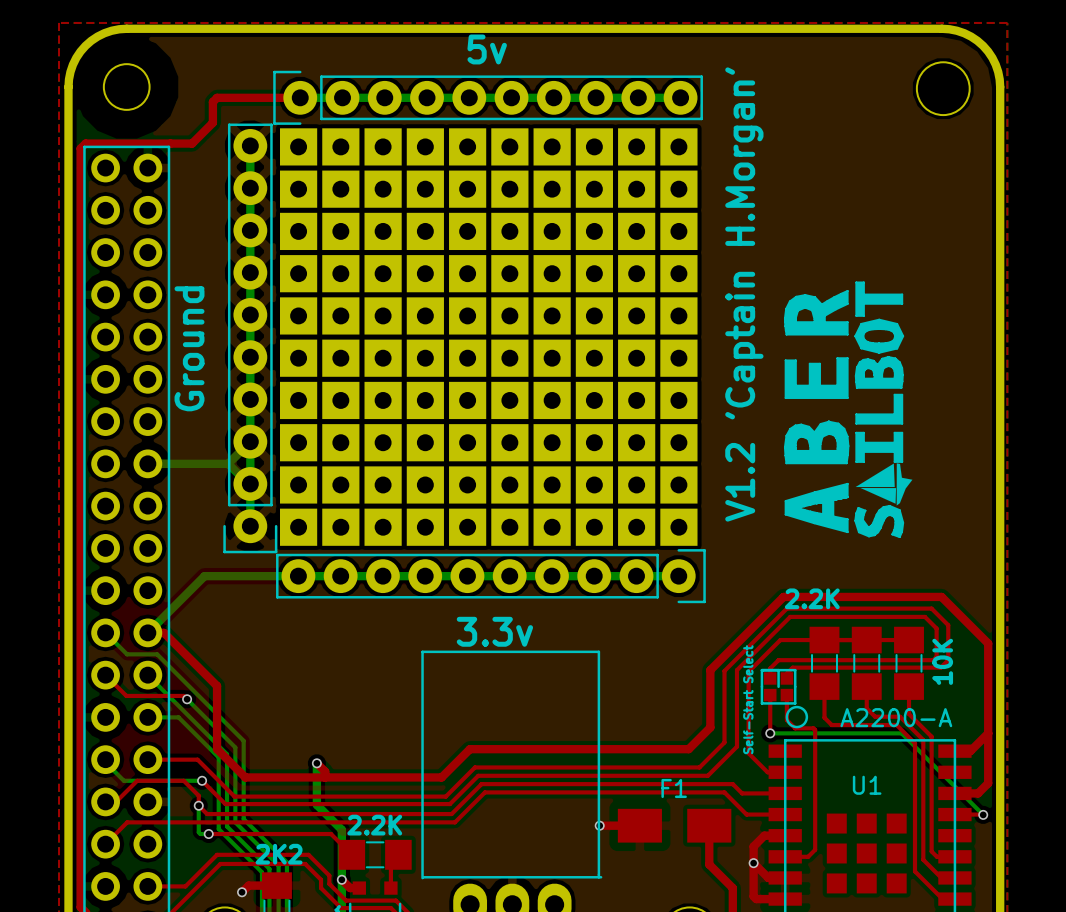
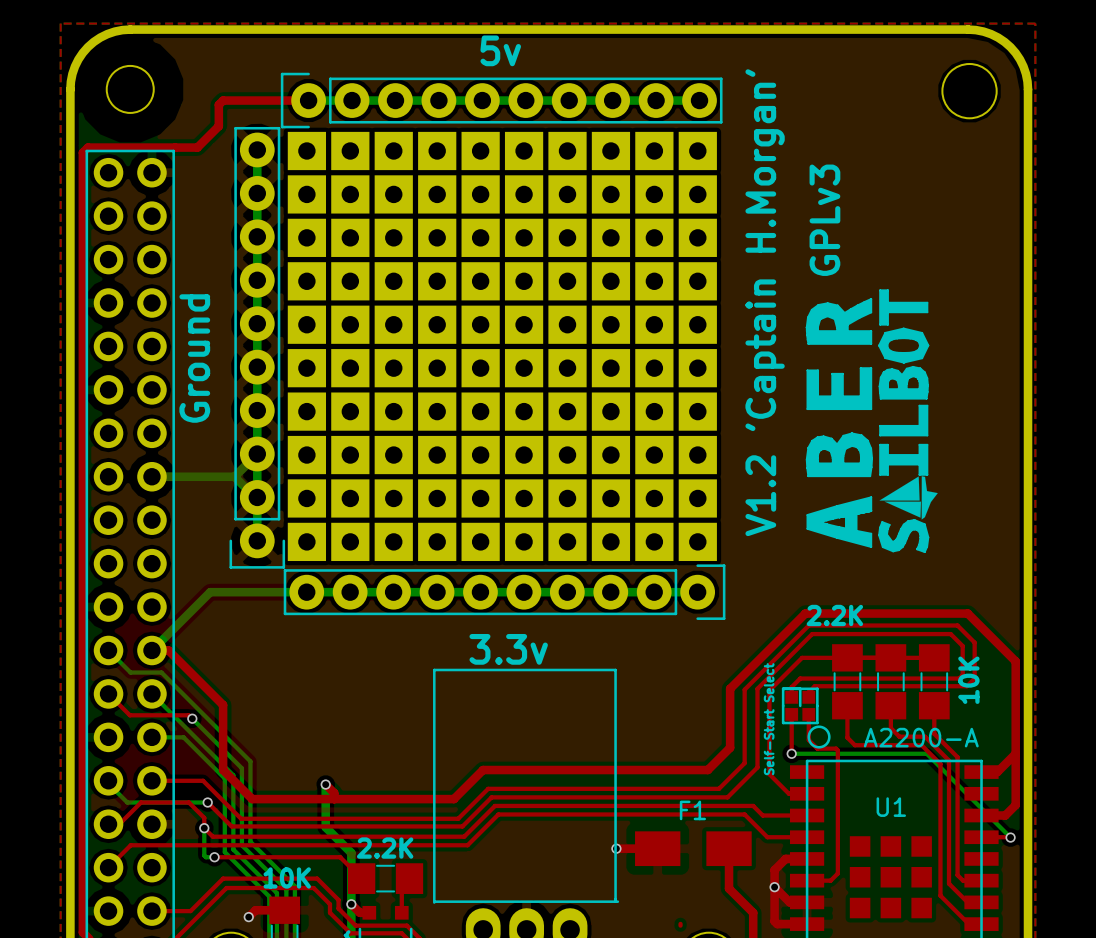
text: none -> GPLv3 (824, 220)
text: 2K2 (279, 854) -> 10K (287, 877)
top track: none -> (680, 923) (680, 925)

